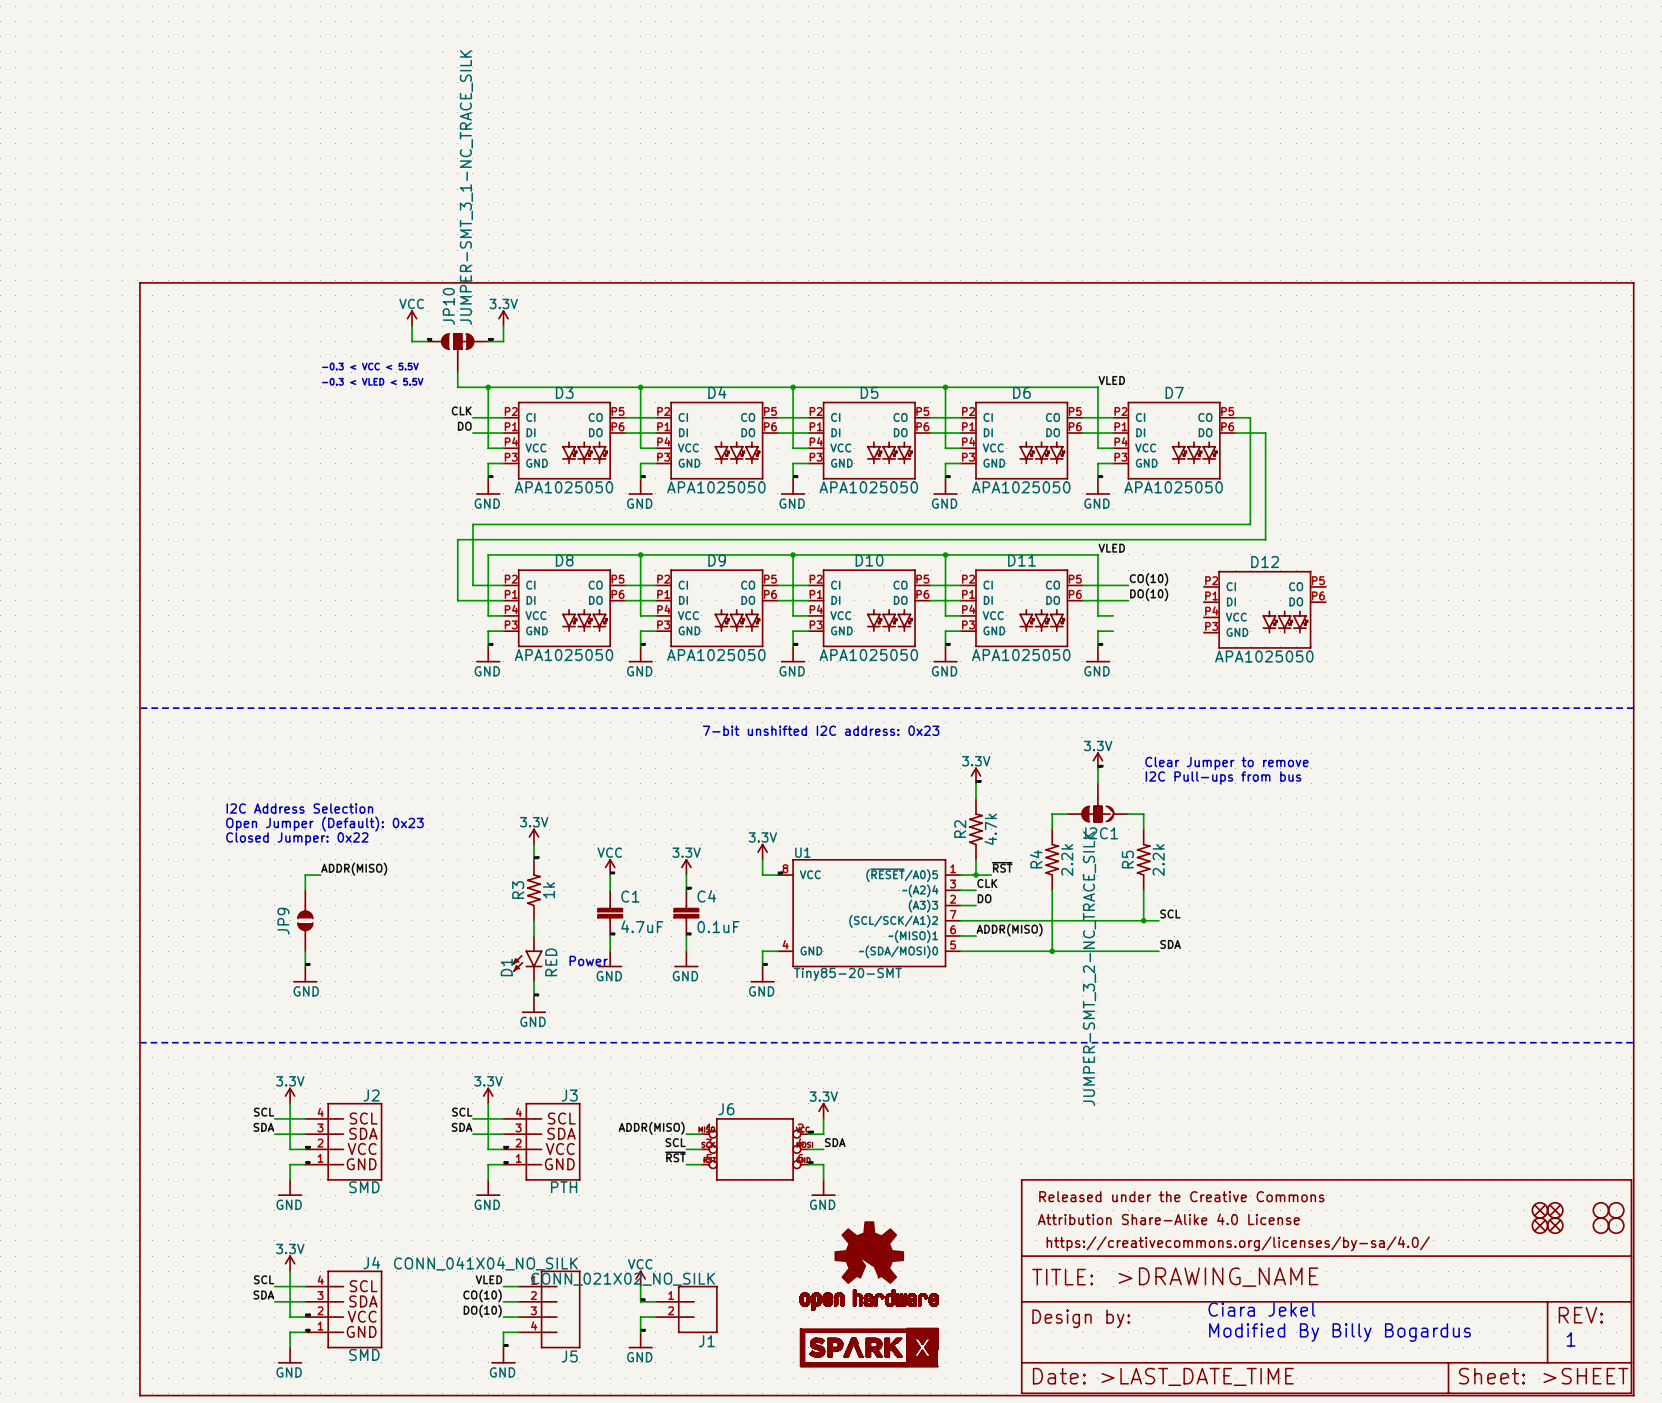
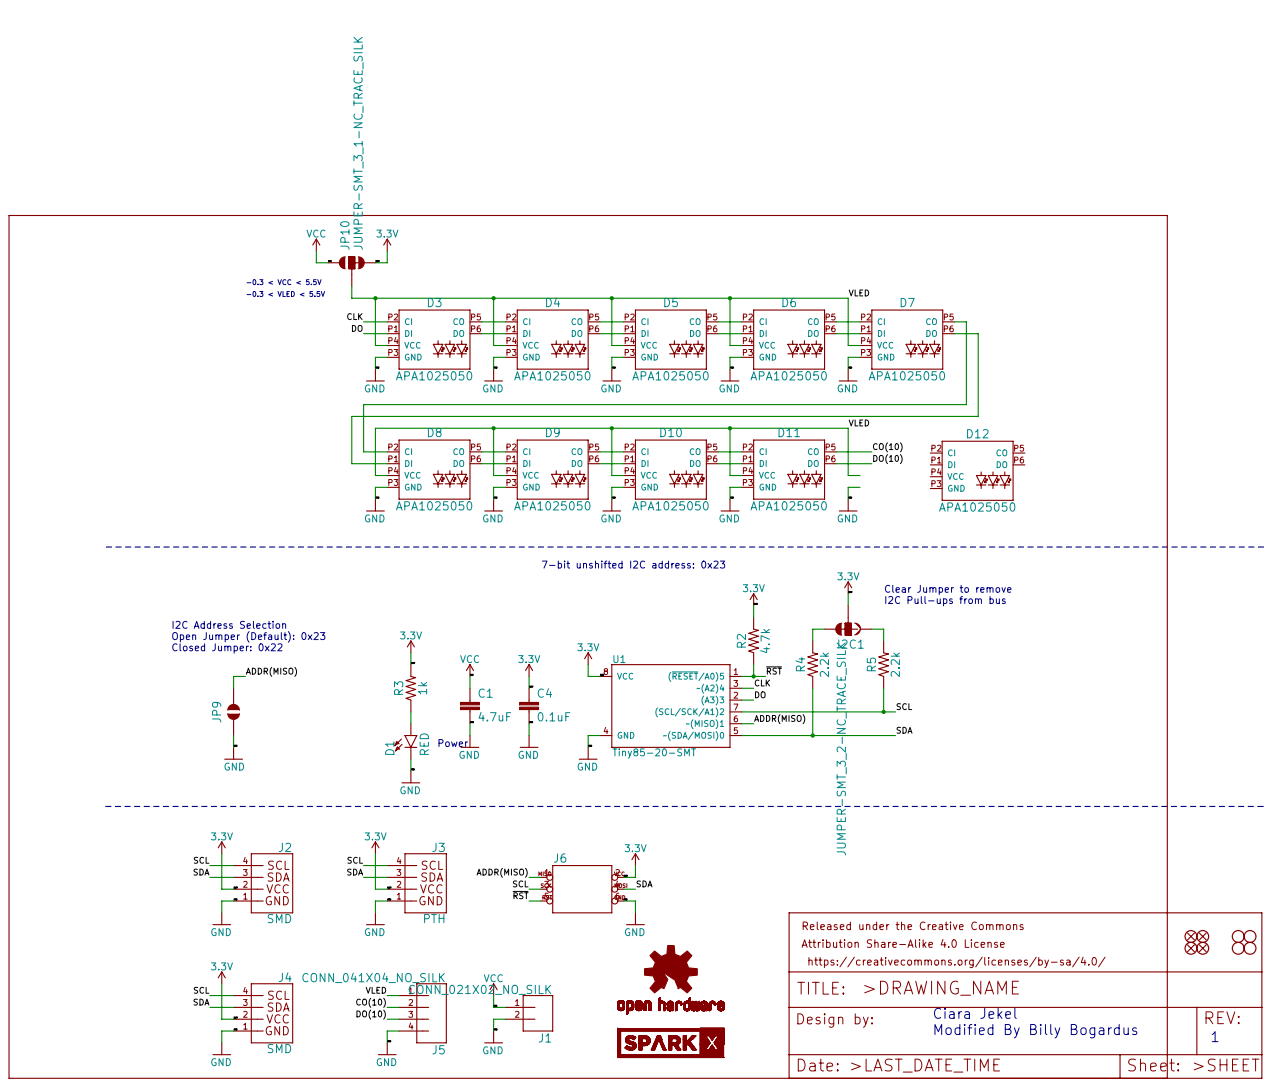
part position: (886, 839) -> (588, 646)

